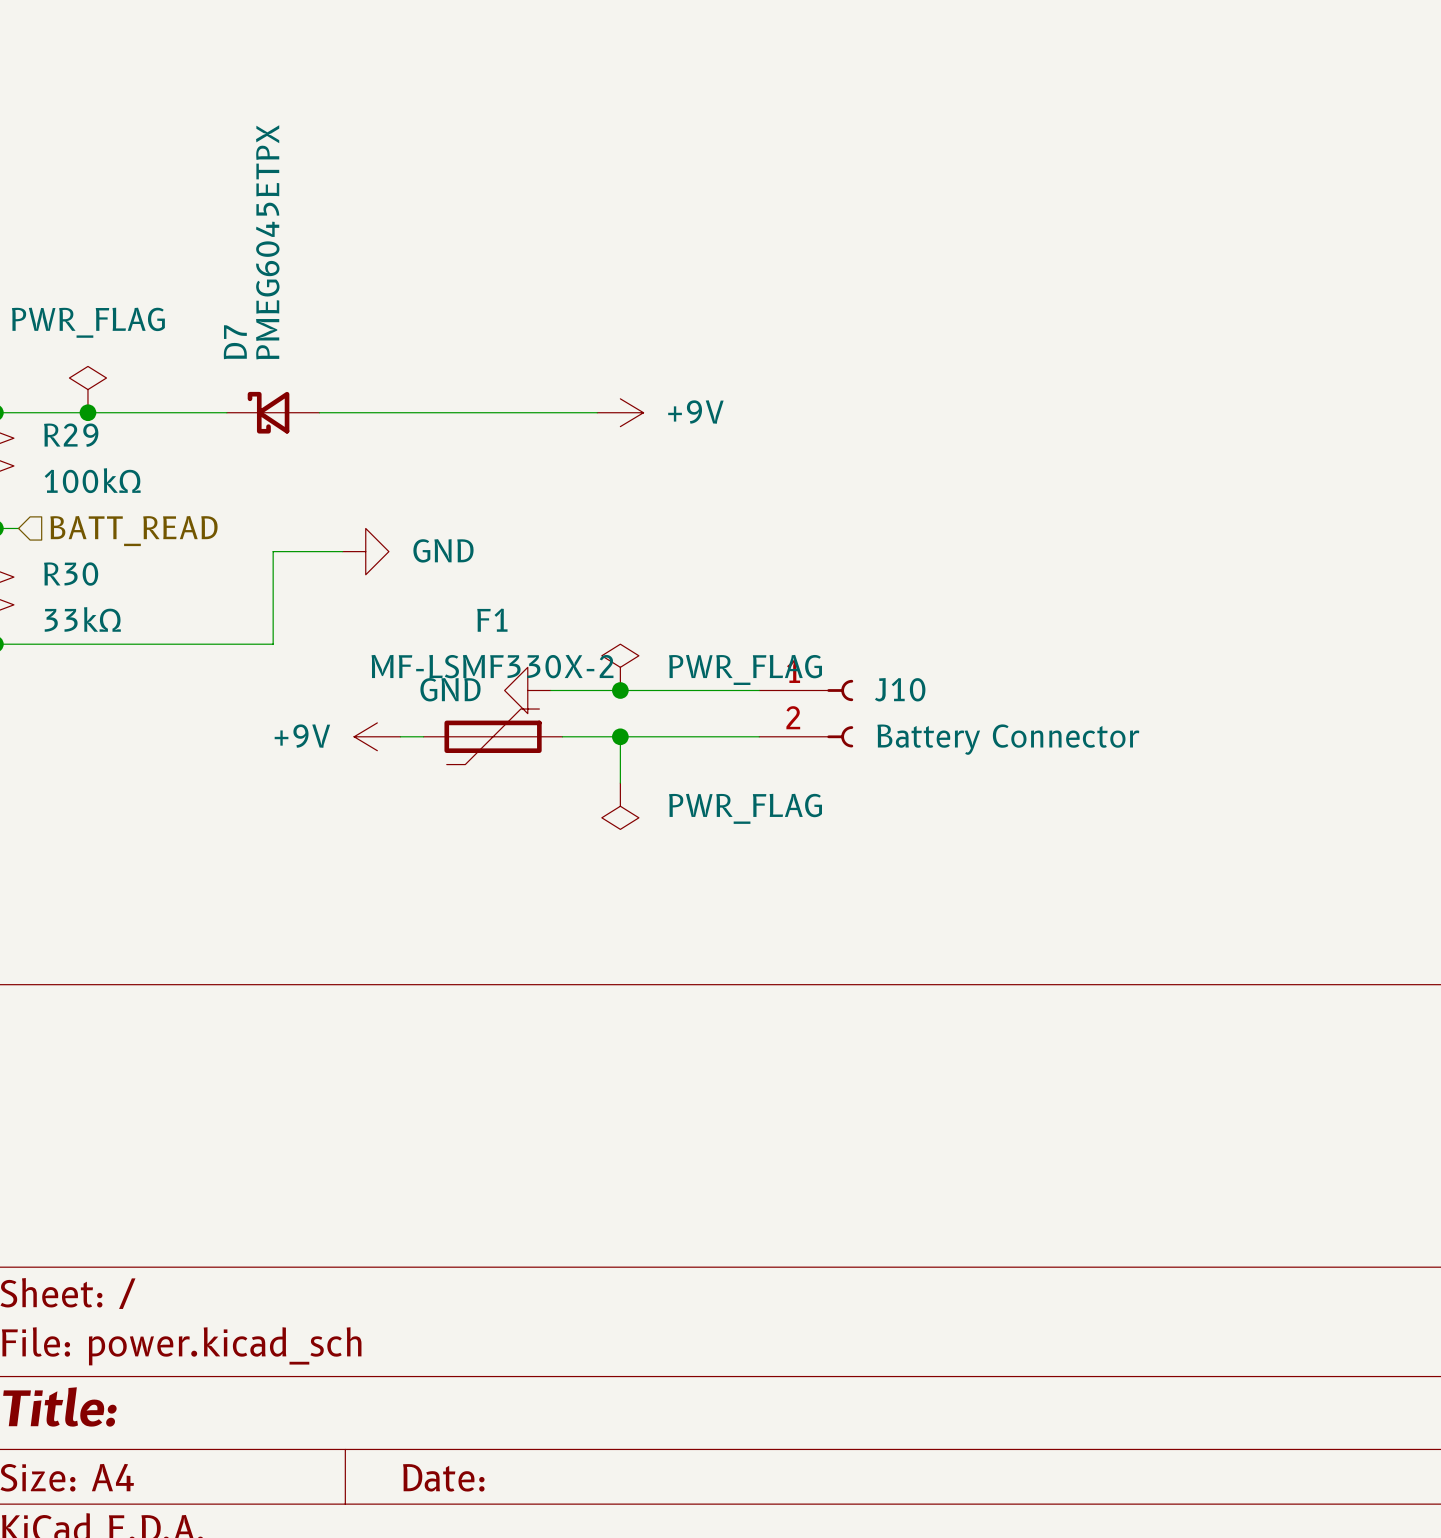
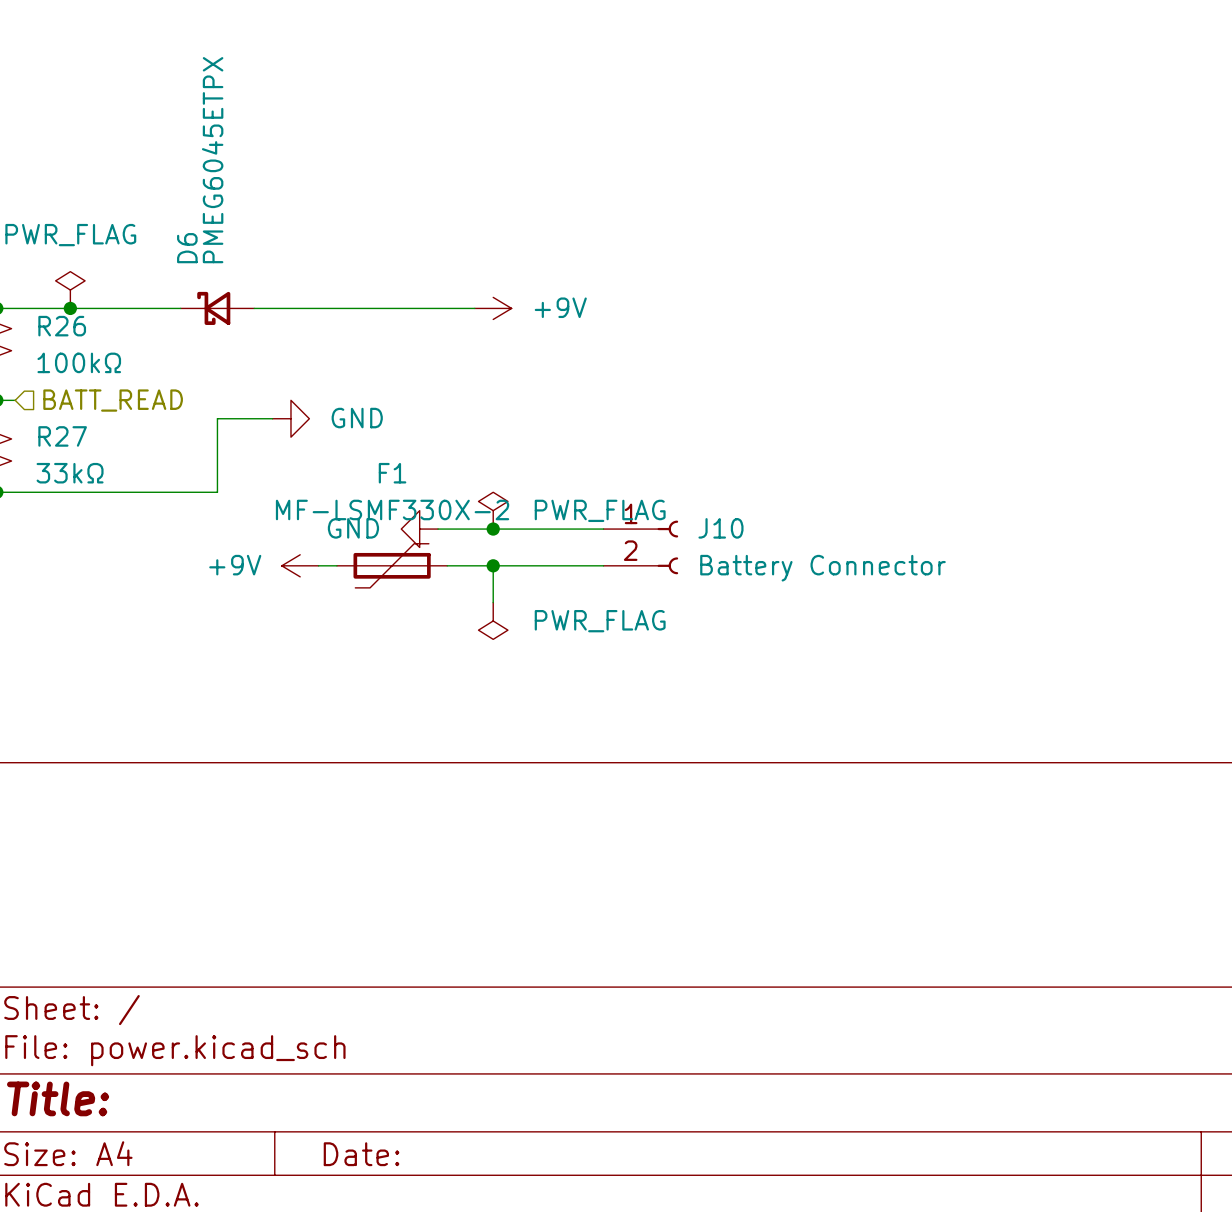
D7 name: D7 (235, 342) -> D6 (187, 248)
R29 name: R29 (71, 435) -> R26 (62, 326)
R30 name: R30 (71, 574) -> R27 (62, 436)

